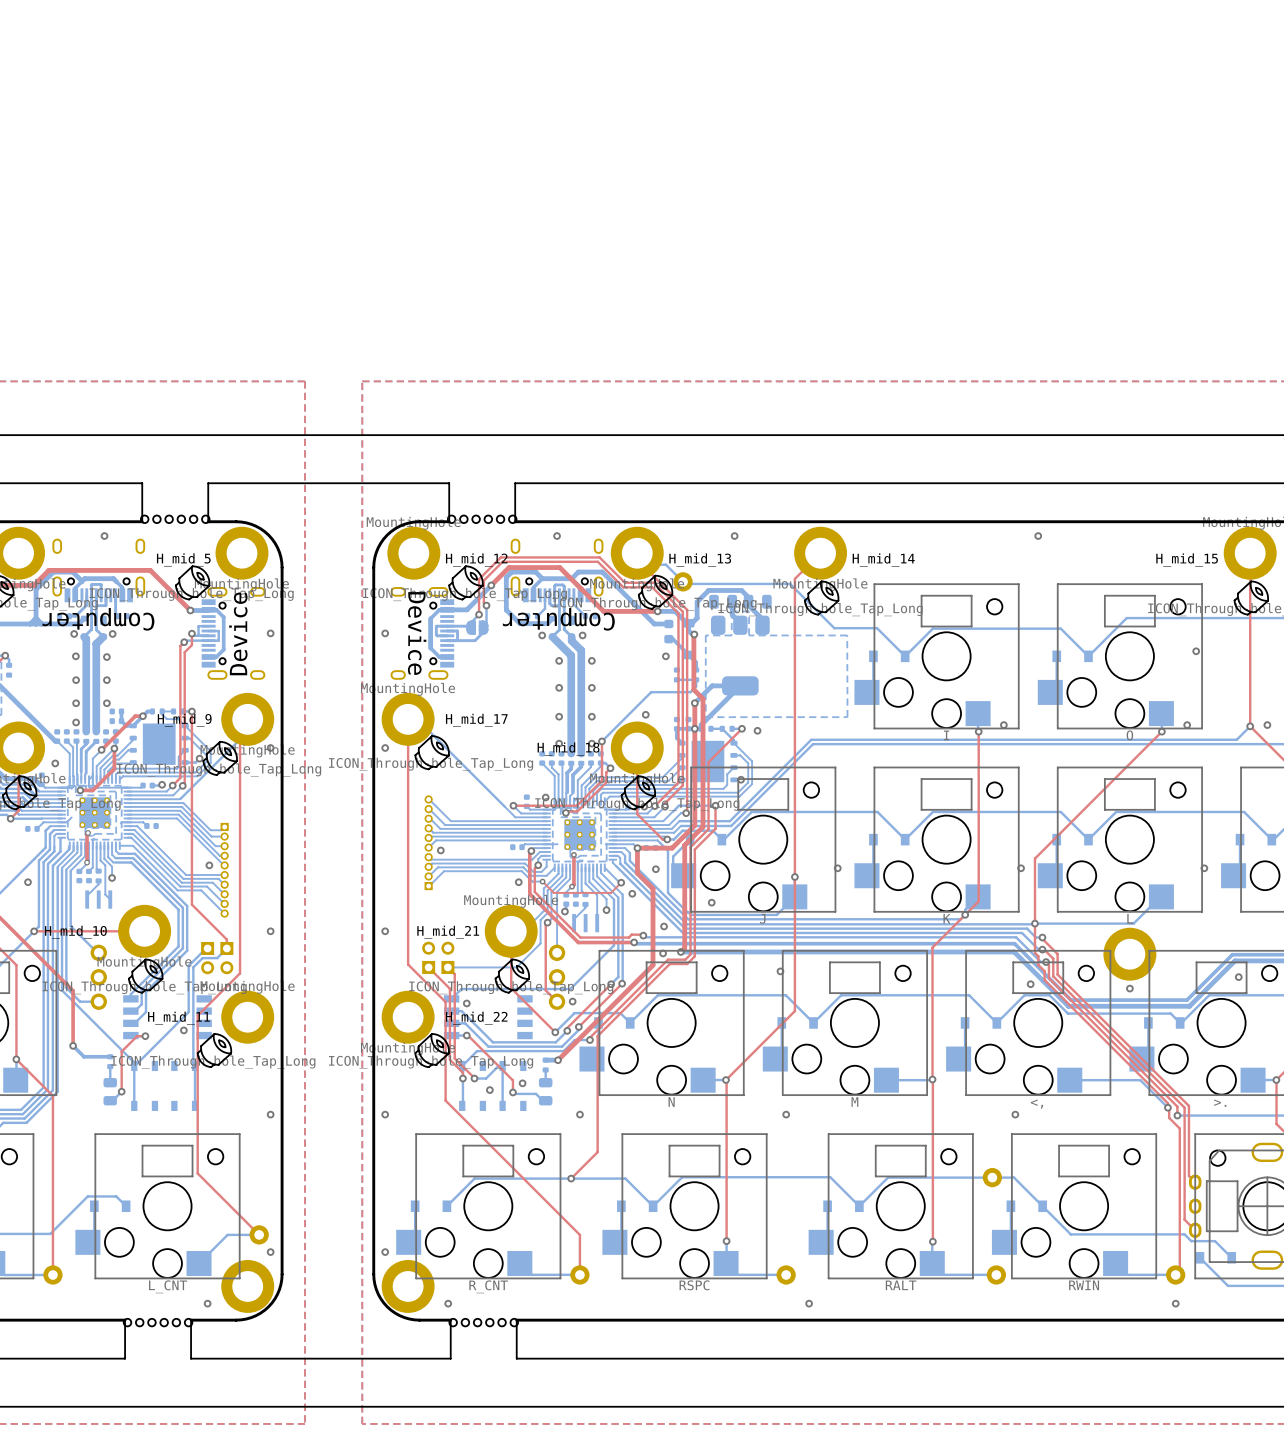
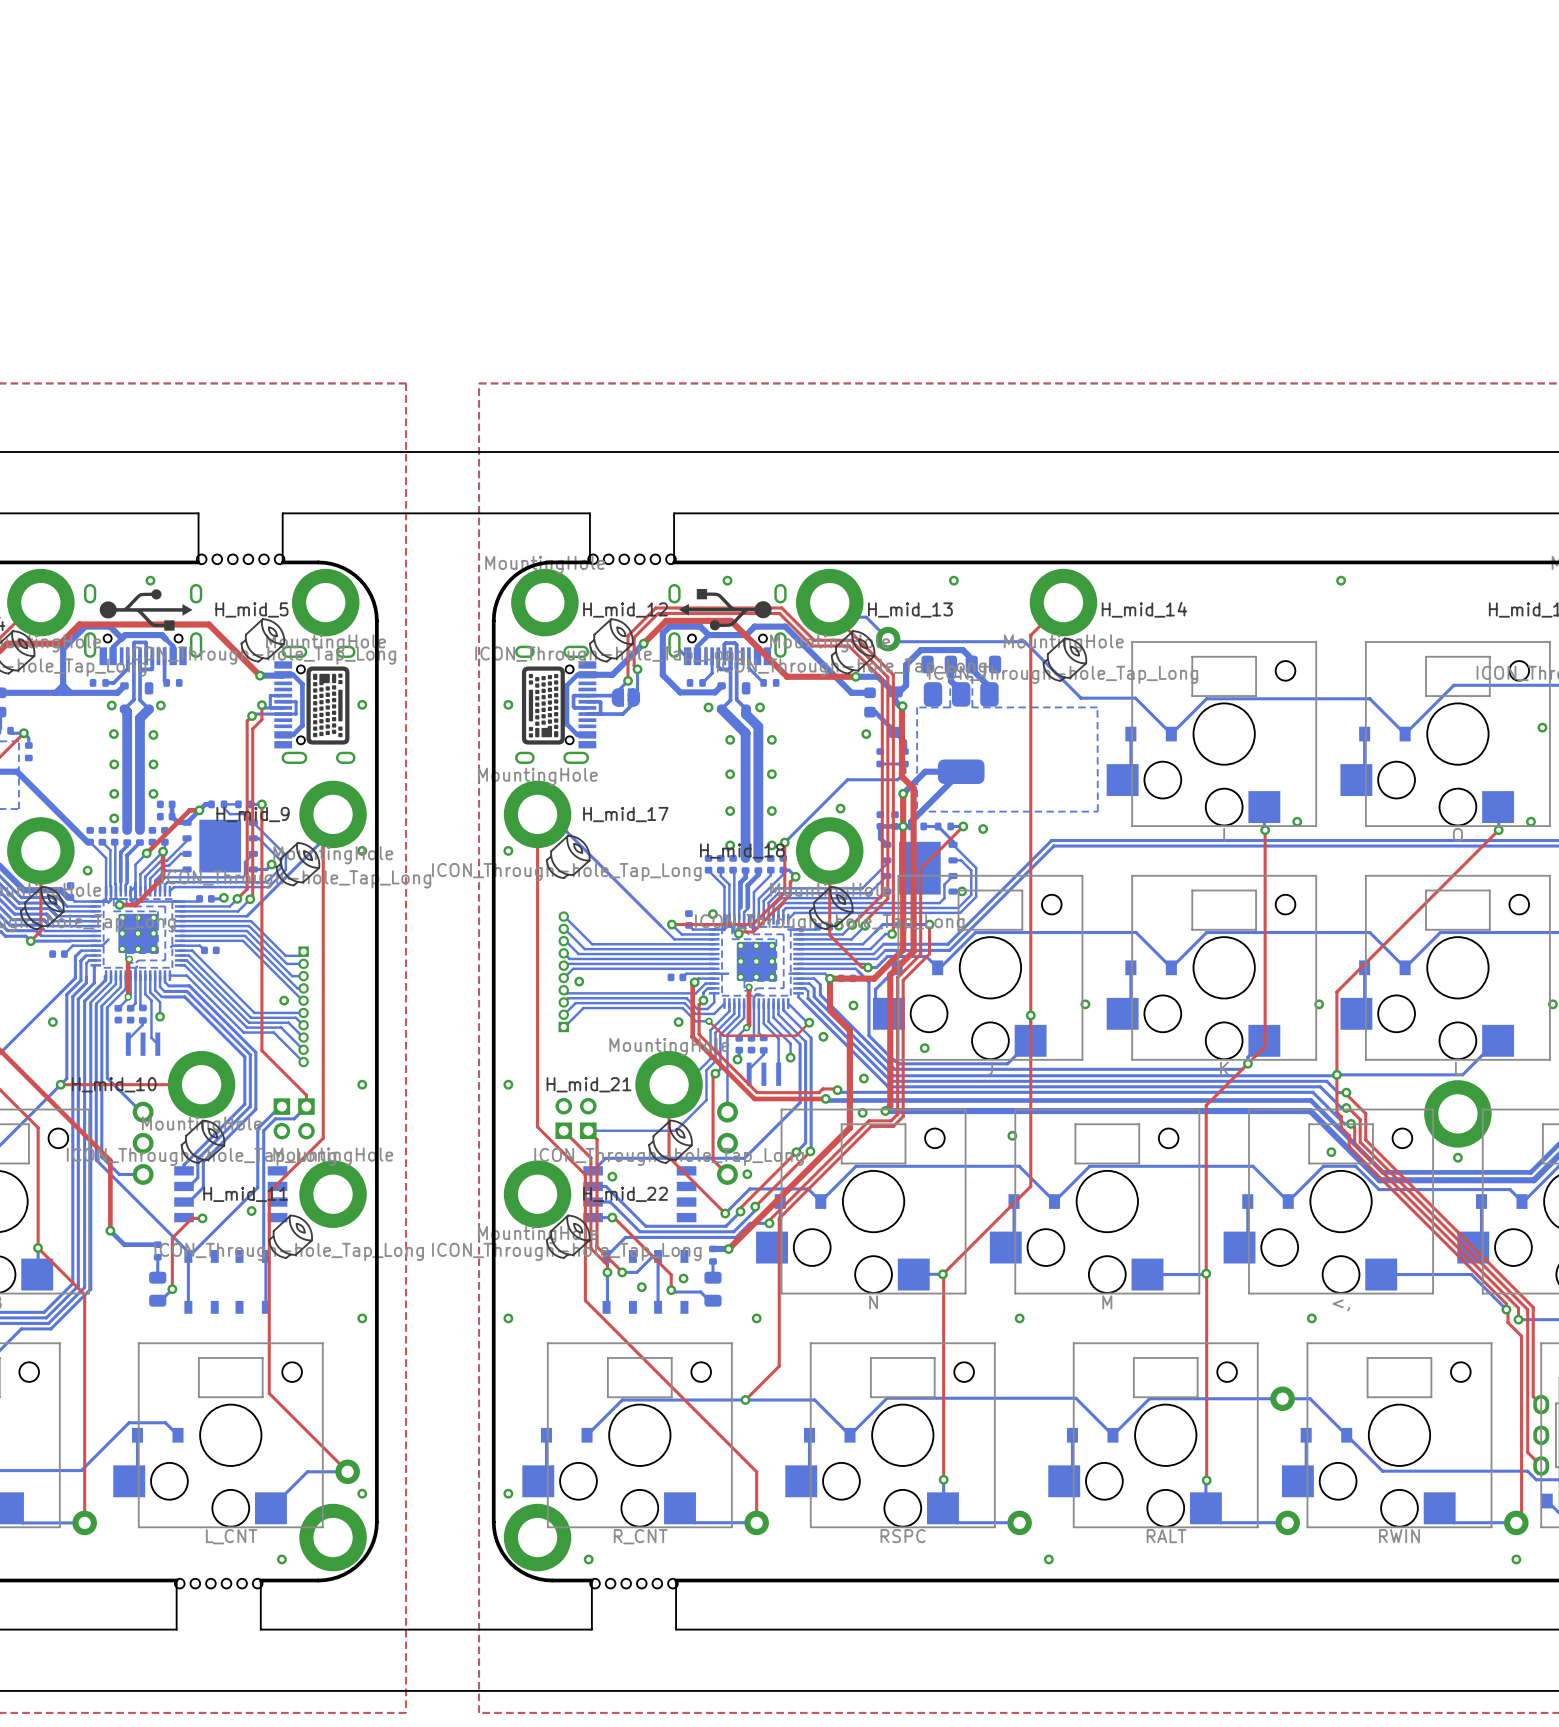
drawing: none -> [99, 589, 193, 631]
drawing: none -> [678, 589, 772, 631]
text: Computer (98, 619) -> none
text: Computer (558, 619) -> none
text: Device (238, 633) -> none
text: none -> ⌨️ (327, 705)
text: none -> ⌨️ (543, 705)
text: Device (417, 633) -> none

